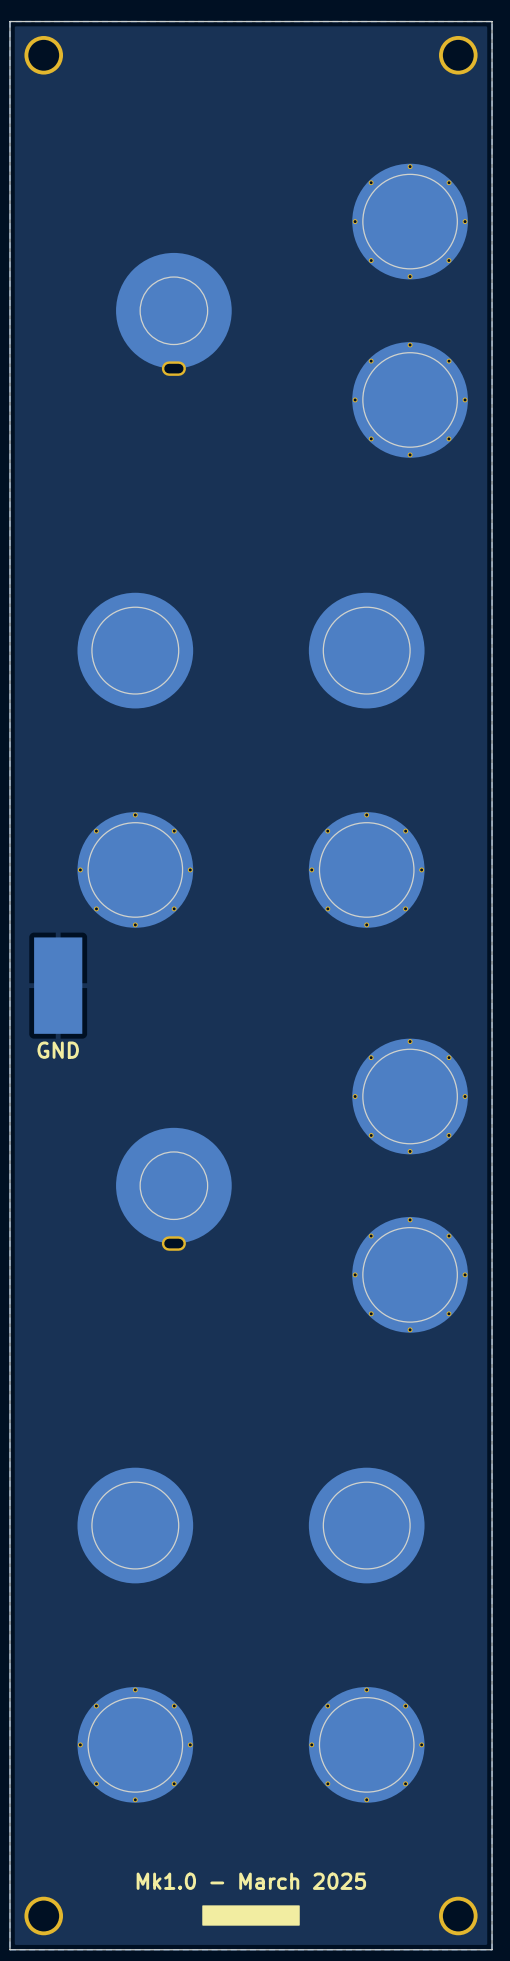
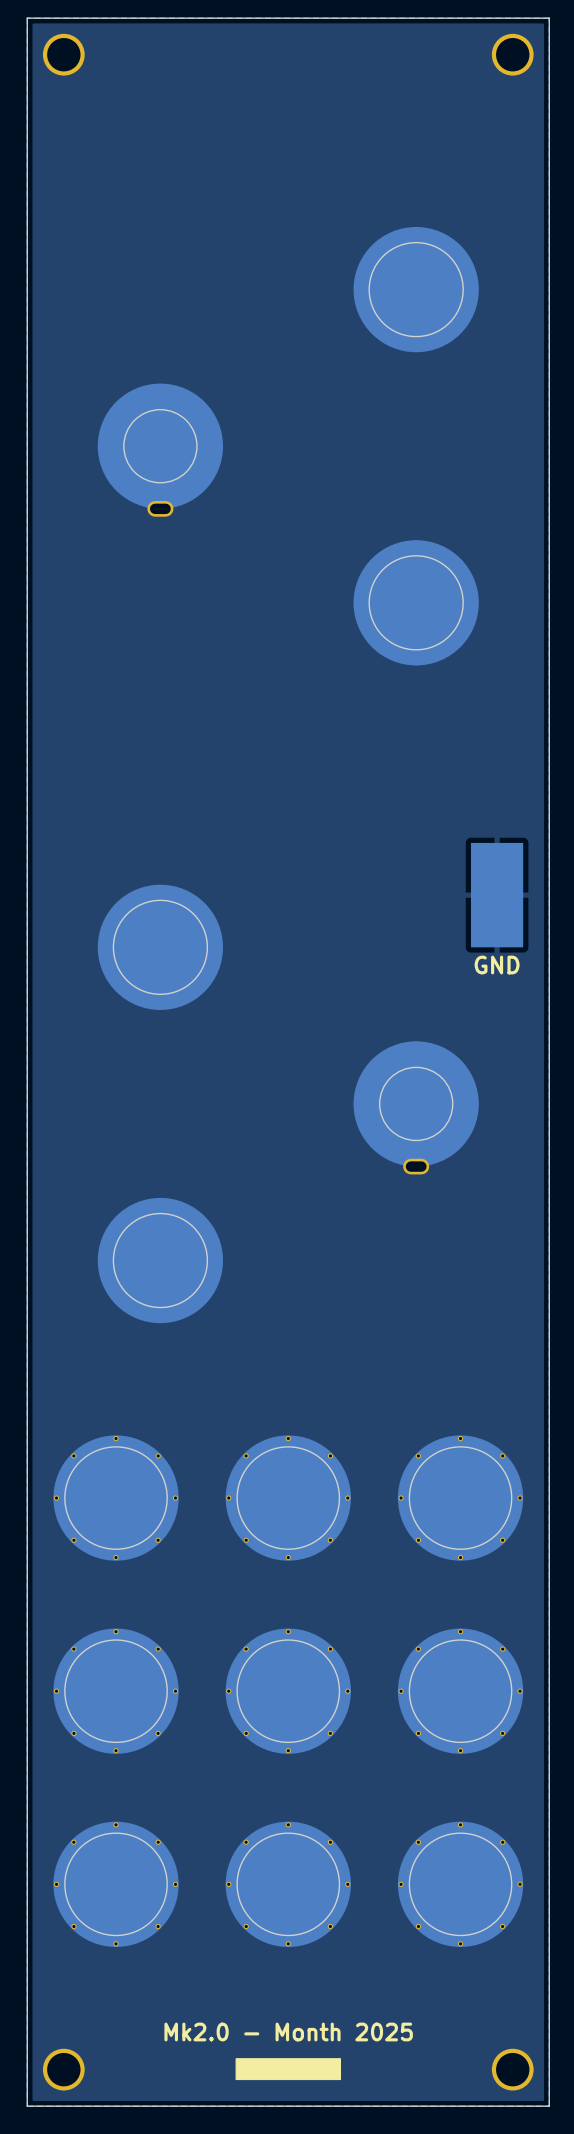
part: (410, 221) -> none
part: none -> (416, 289)
part position: (173, 314) -> (160, 450)
part: (410, 399) -> none
part: (135, 650) -> none
part position: (366, 650) -> (416, 602)
part: none -> (497, 895)
part: (135, 869) -> none
part: (366, 869) -> none
part: none -> (160, 947)
part: (58, 985) -> none
part: none -> (416, 1107)
part: (410, 1096) -> none
part: none -> (160, 1260)
part: (173, 1189) -> none
part: (410, 1274) -> none
part: none -> (116, 1498)
part: none -> (288, 1498)
part: none -> (460, 1498)
part: (135, 1525) -> none
part: (366, 1525) -> none
part: none -> (116, 1691)
part: none -> (288, 1691)
part: none -> (460, 1691)
part position: (135, 1744) -> (116, 1884)
part: none -> (288, 1884)
part position: (366, 1744) -> (460, 1884)
text: Mk1.0 - March 2025 (251, 1881) -> Mk2.0 - Month 2025 (288, 2032)

